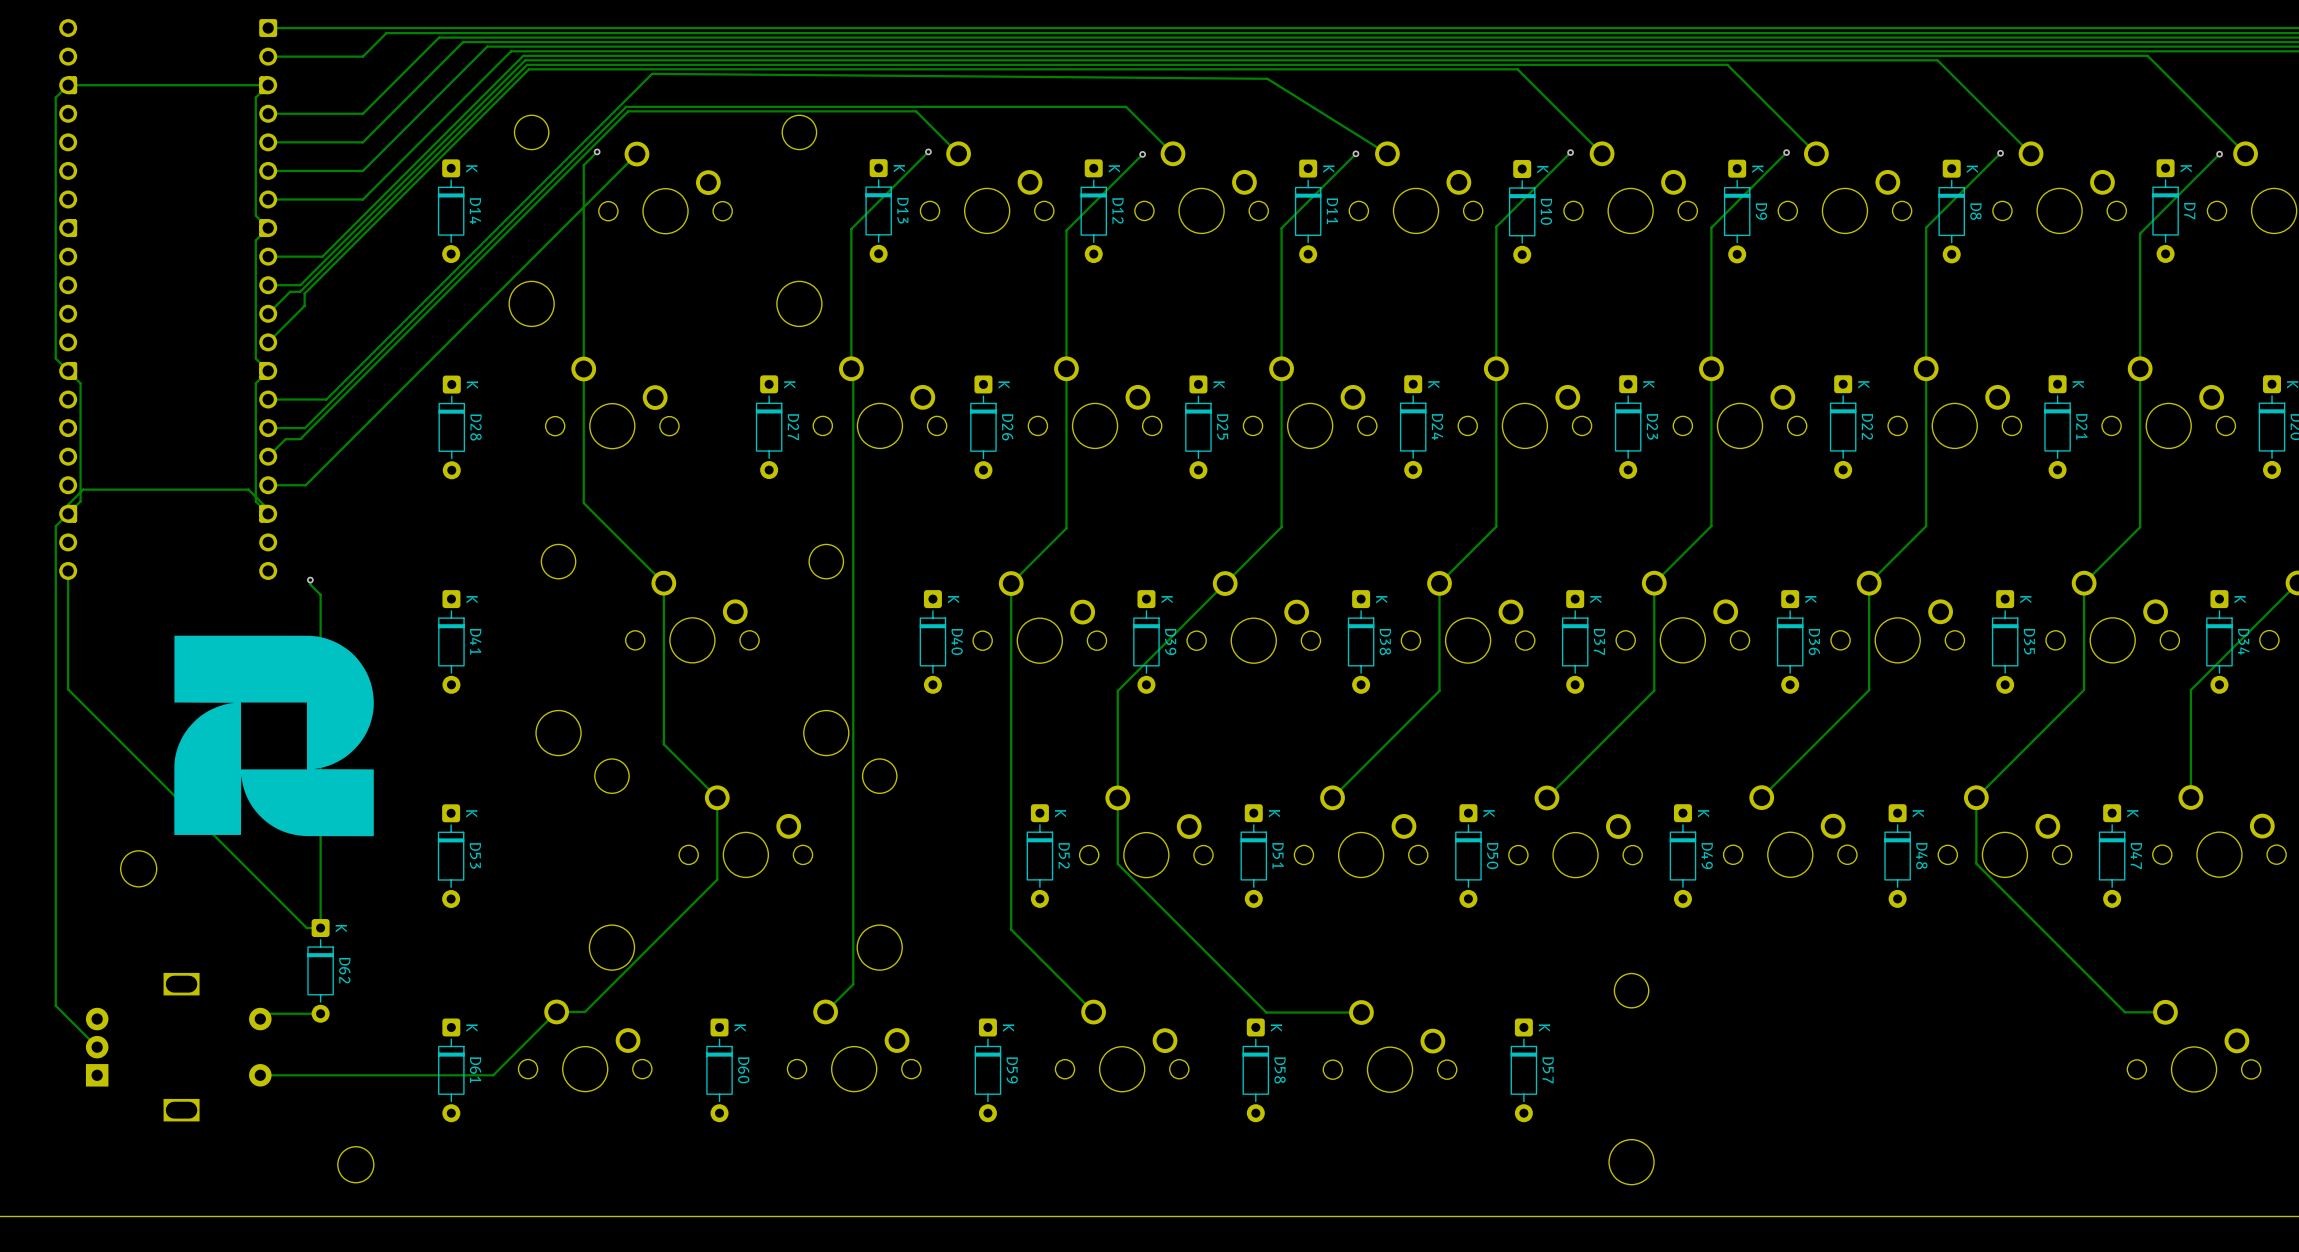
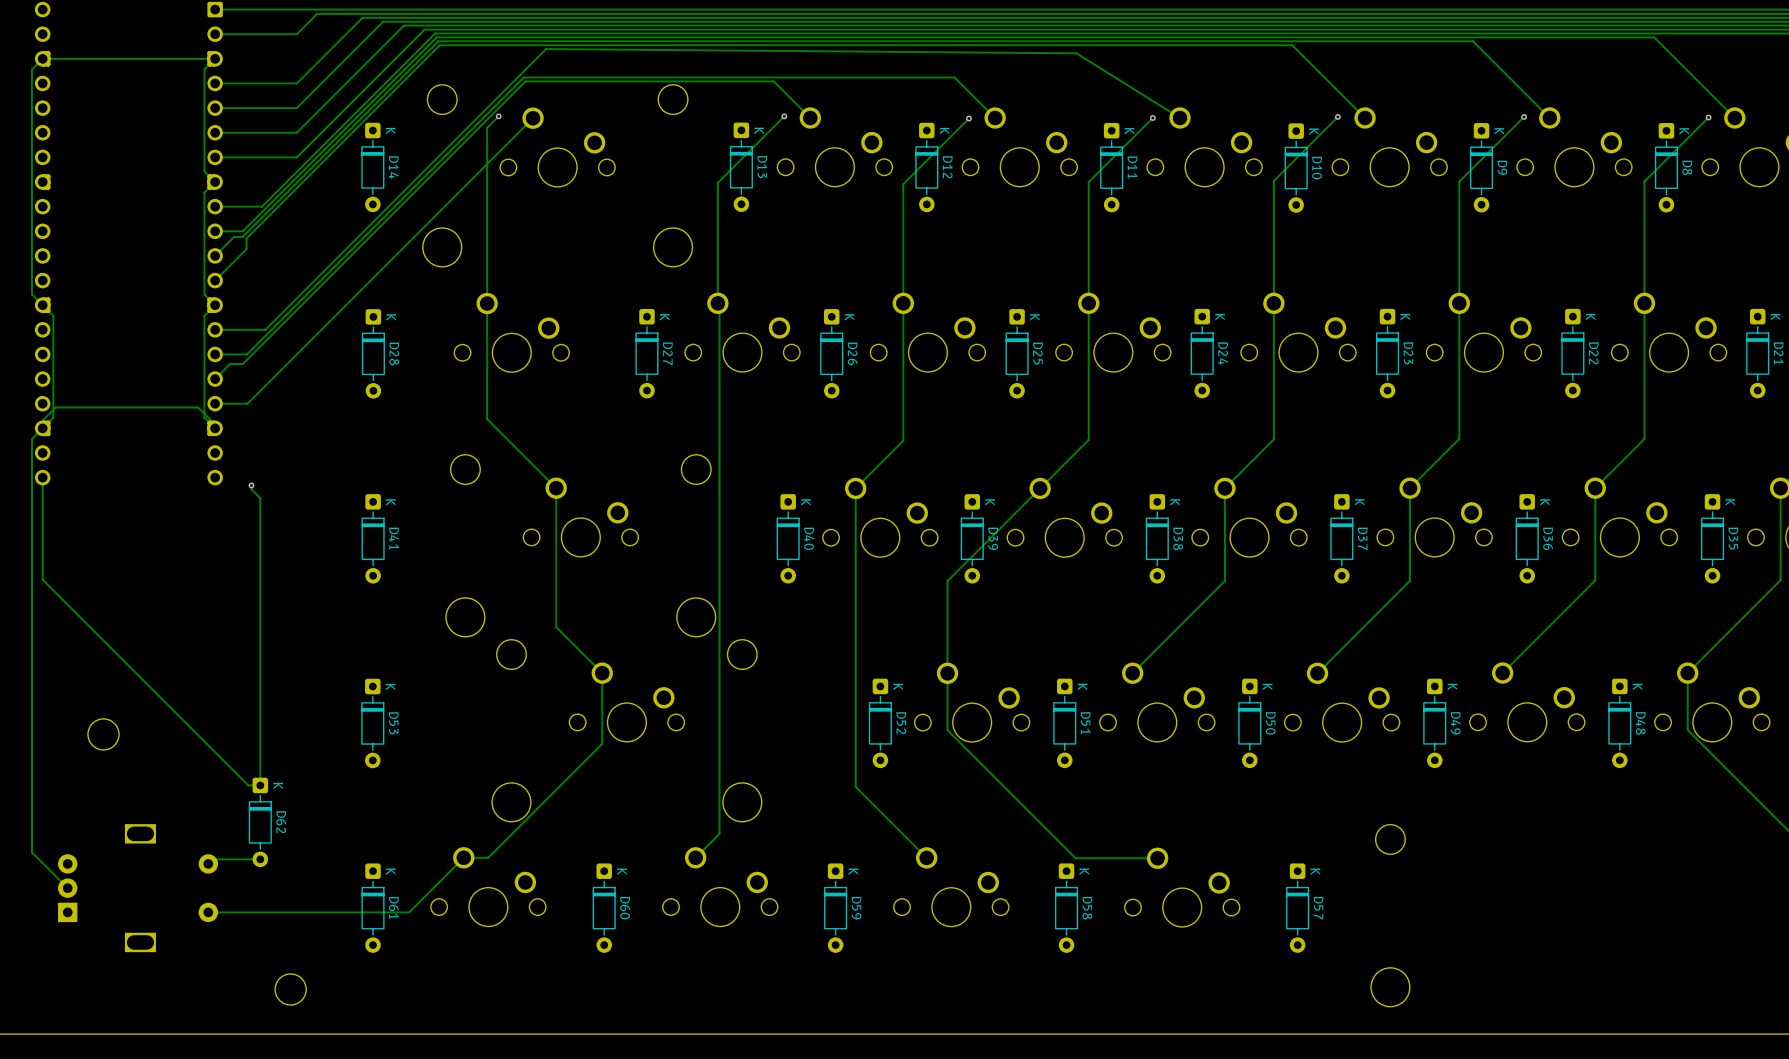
drawing: [174, 635, 374, 837] -> none

